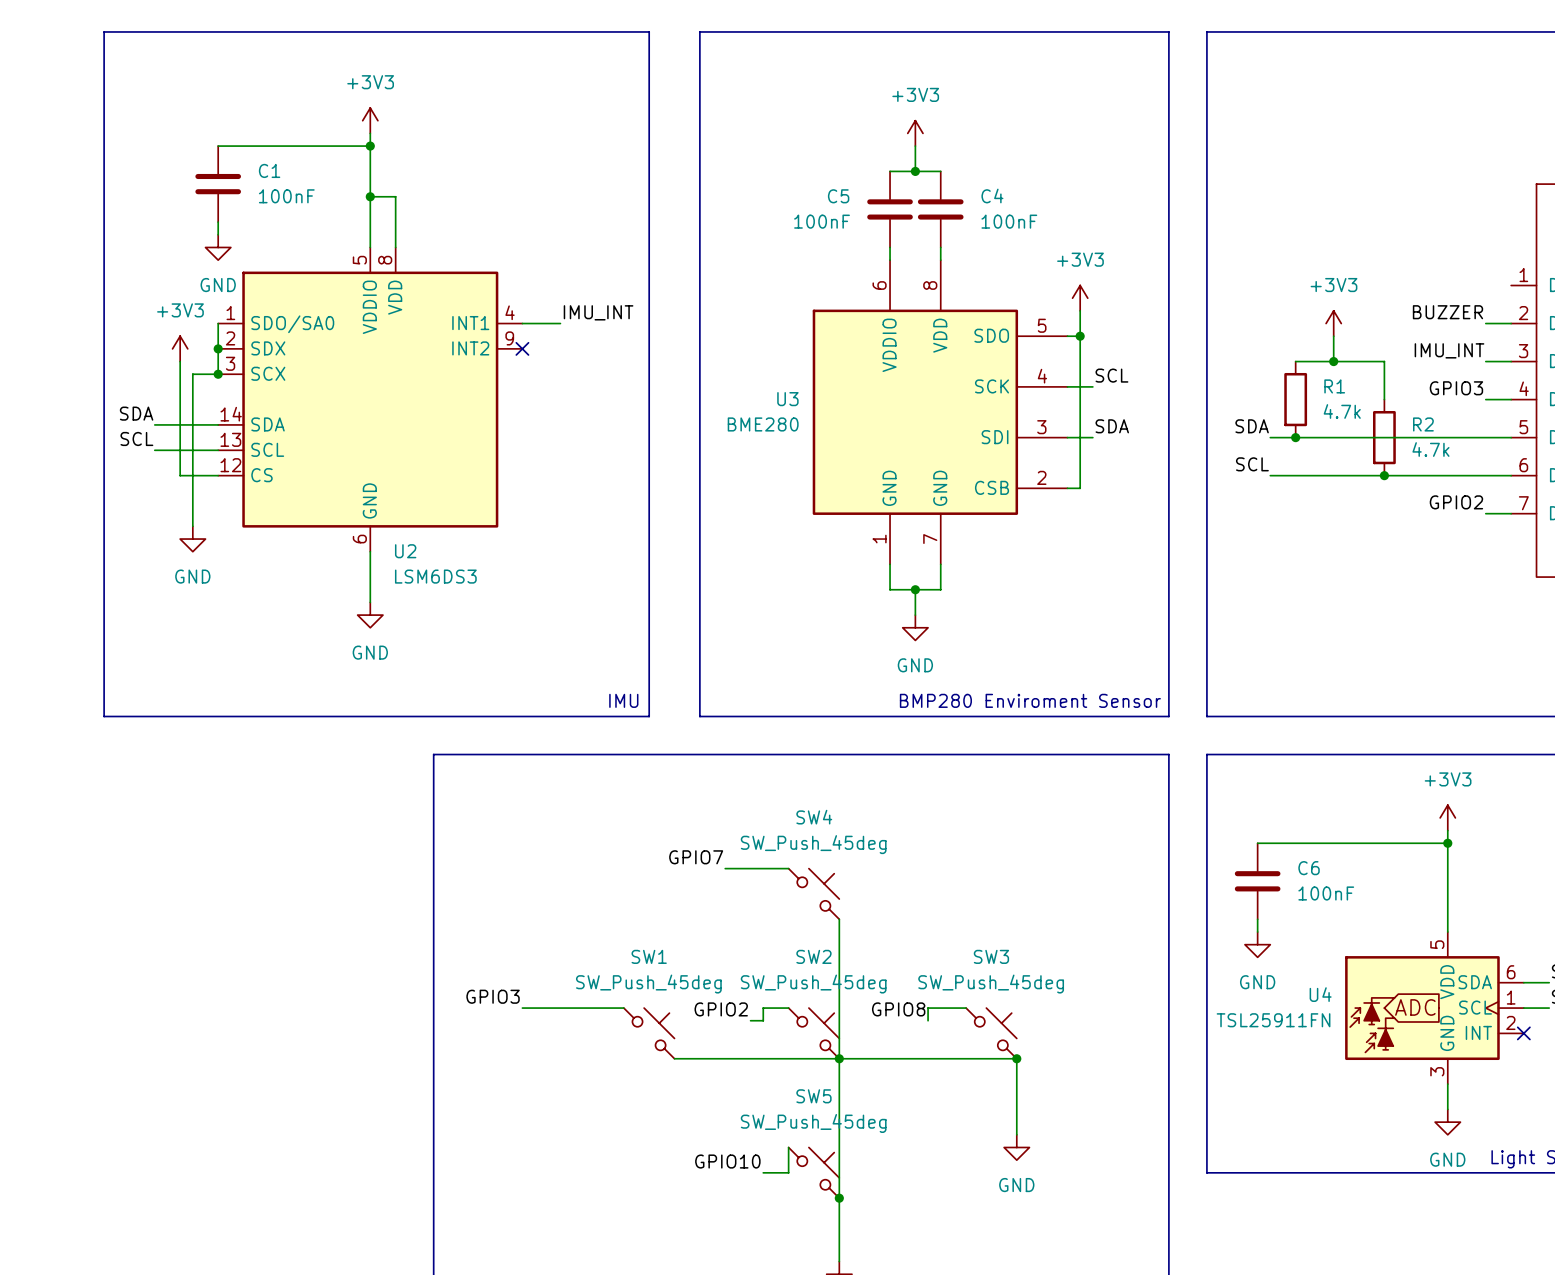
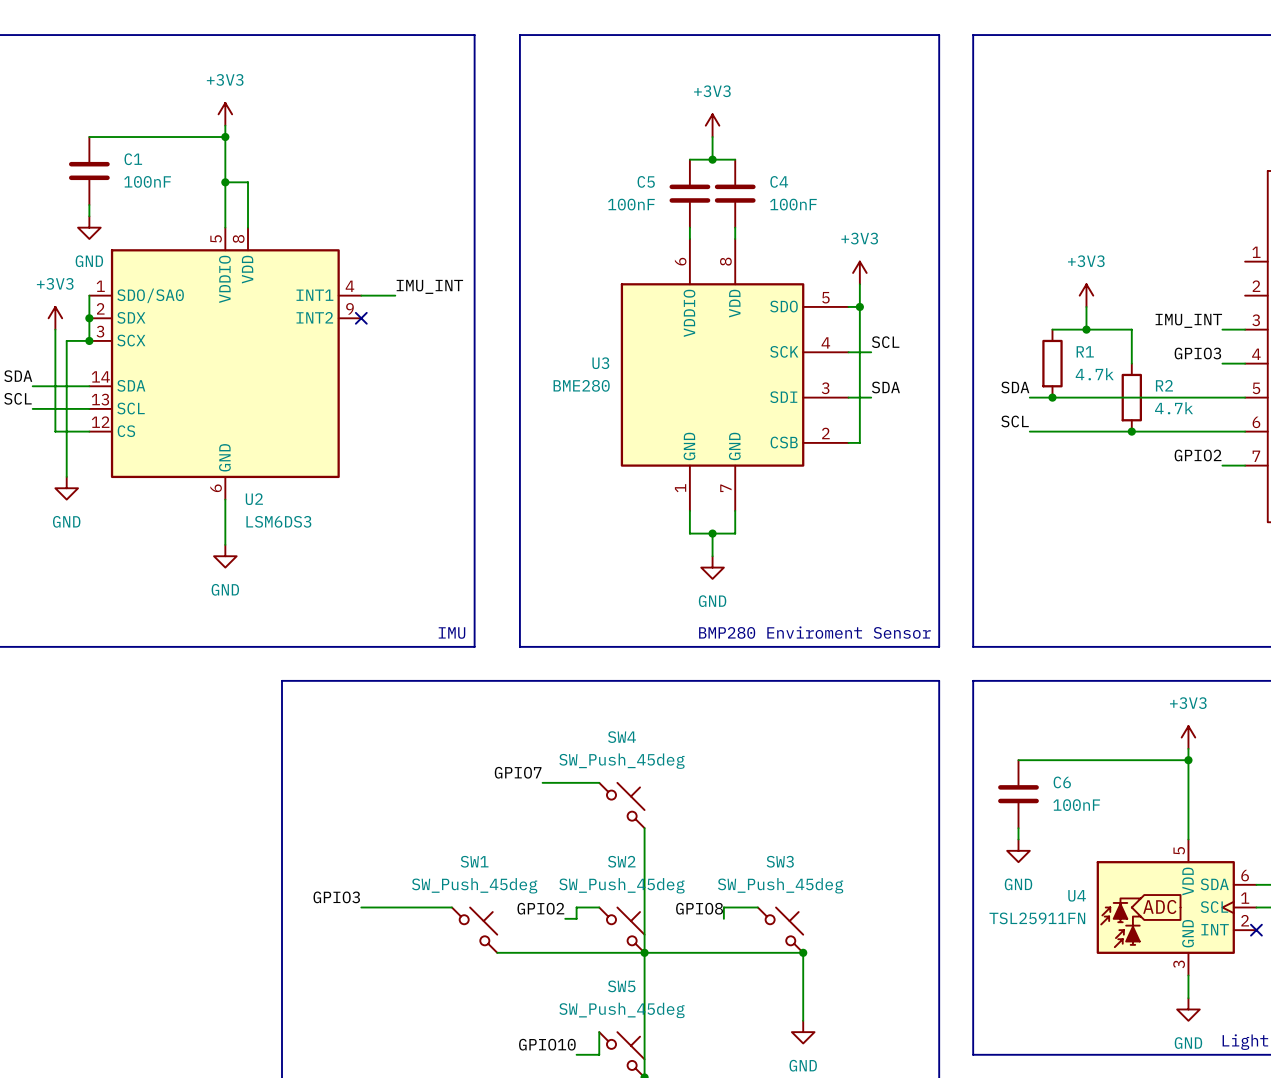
label: BUZZER (1447, 312) -> none
wire: (1485, 323) (1511, 323) -> none

